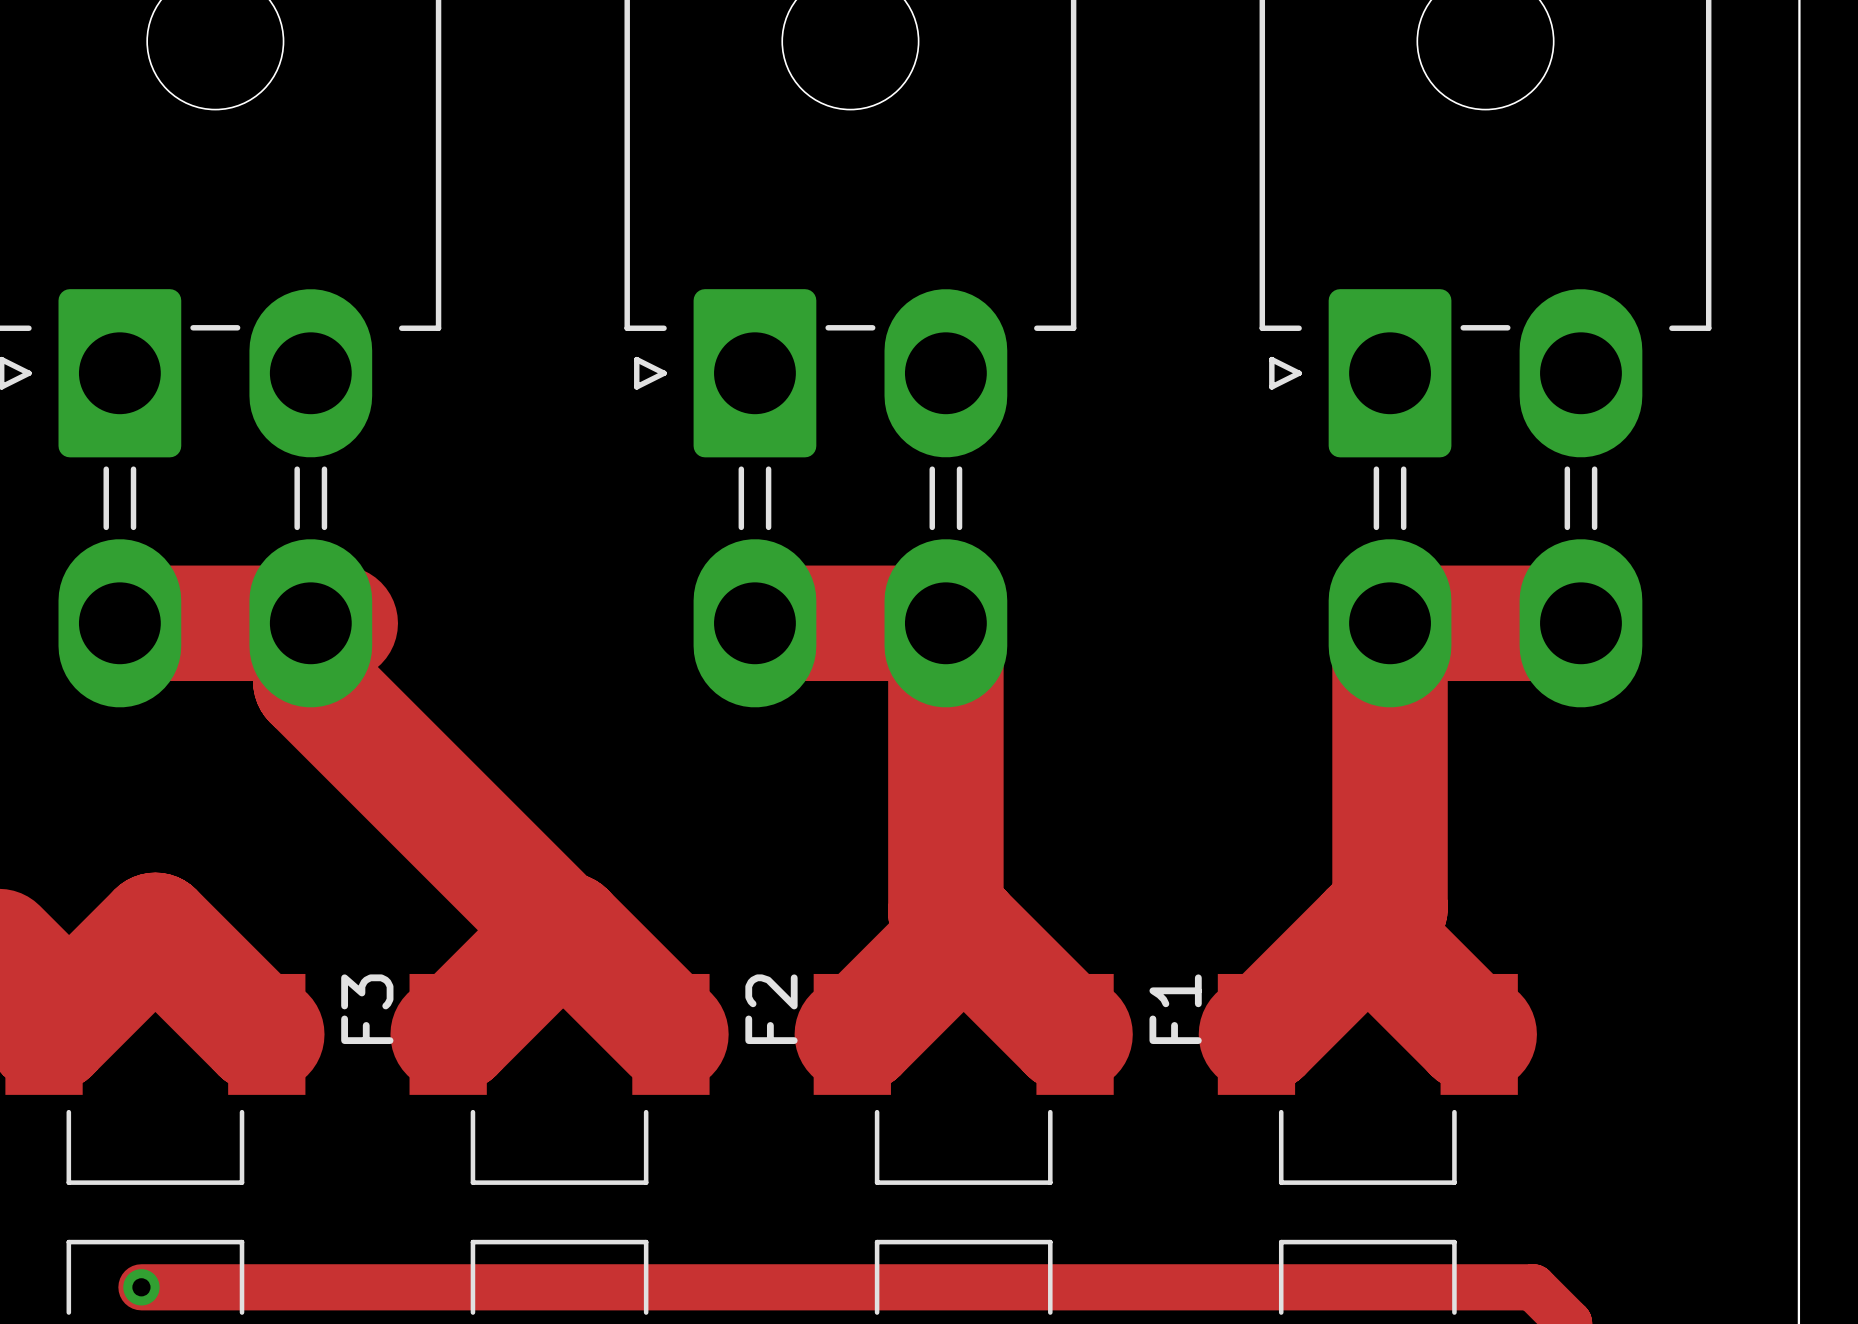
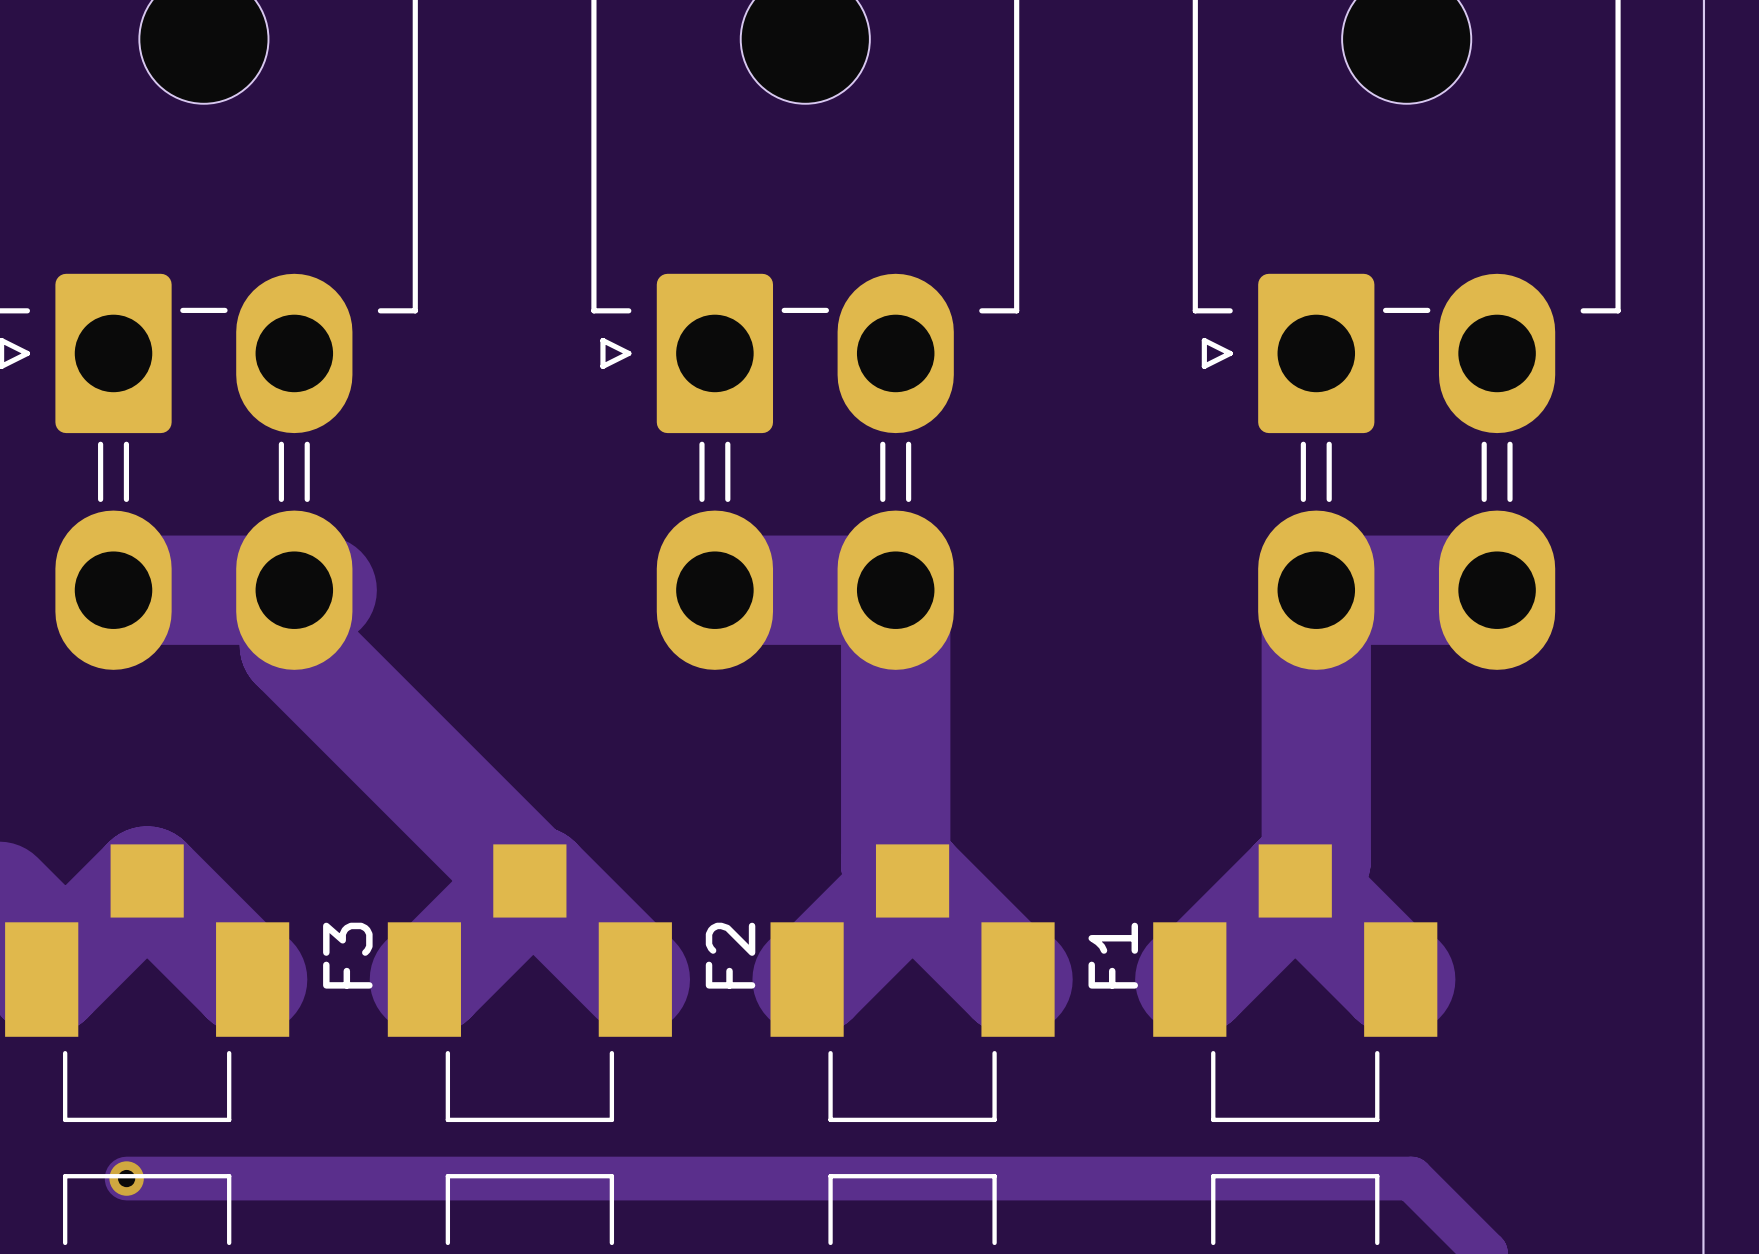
track: (141, 1287) (1533, 1287) -> (126, 1178) (1411, 1178) (1451, 1219)
via position: (141, 1287) -> (126, 1178)

